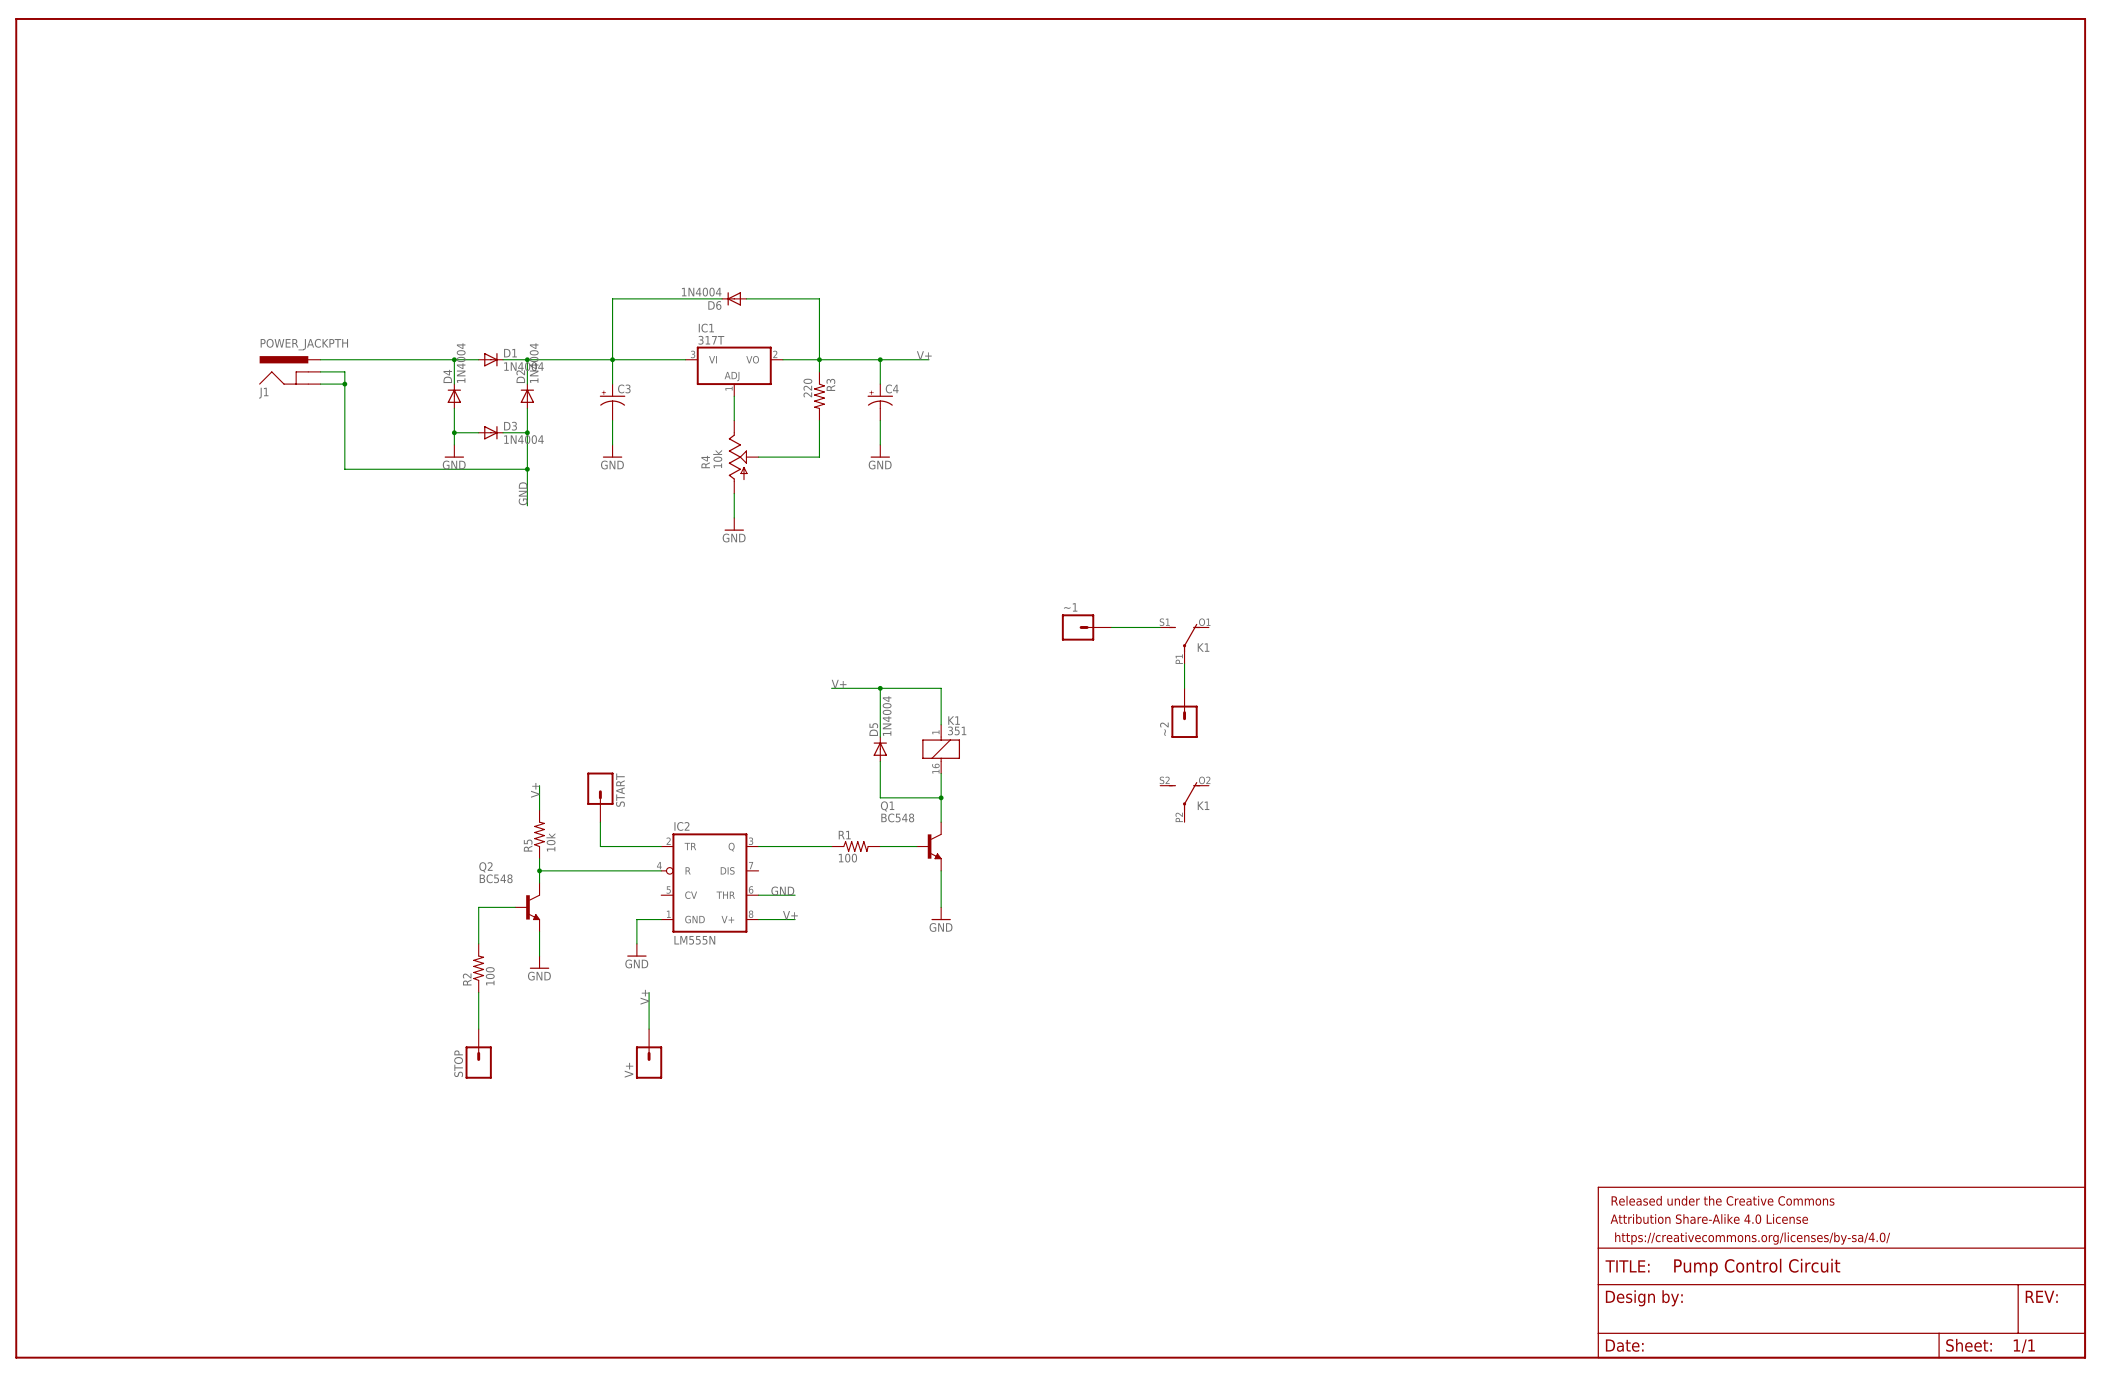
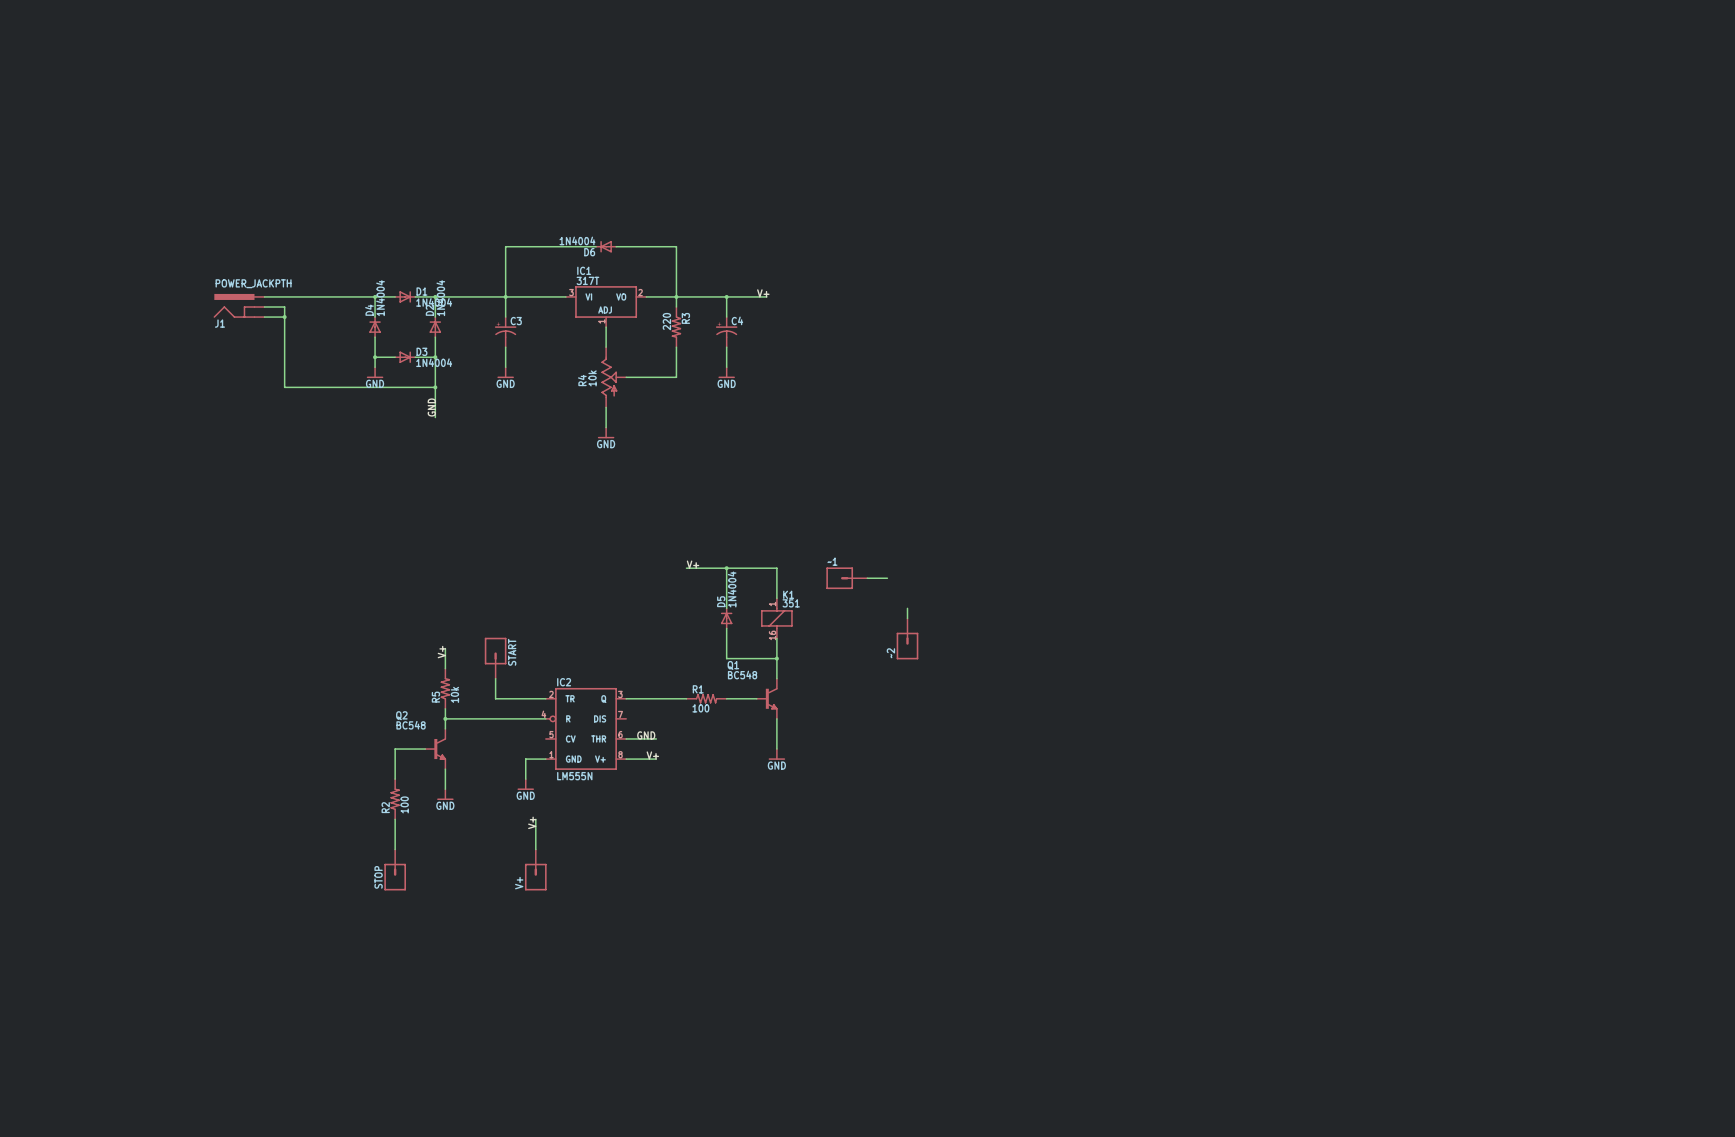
~1 position: (1086, 627) -> (846, 578)
wire: (1111, 627) (1160, 627) -> none
K1: (1184, 643) -> none
wire: (1184, 663) (1184, 688) -> none
part: (1050, 688) -> none
wire: none -> (867, 578) (887, 578)
~2 position: (1184, 713) -> (907, 638)
wire: none -> (907, 608) (907, 618)
K1: (1184, 802) -> none
part: (1841, 1272) -> none

